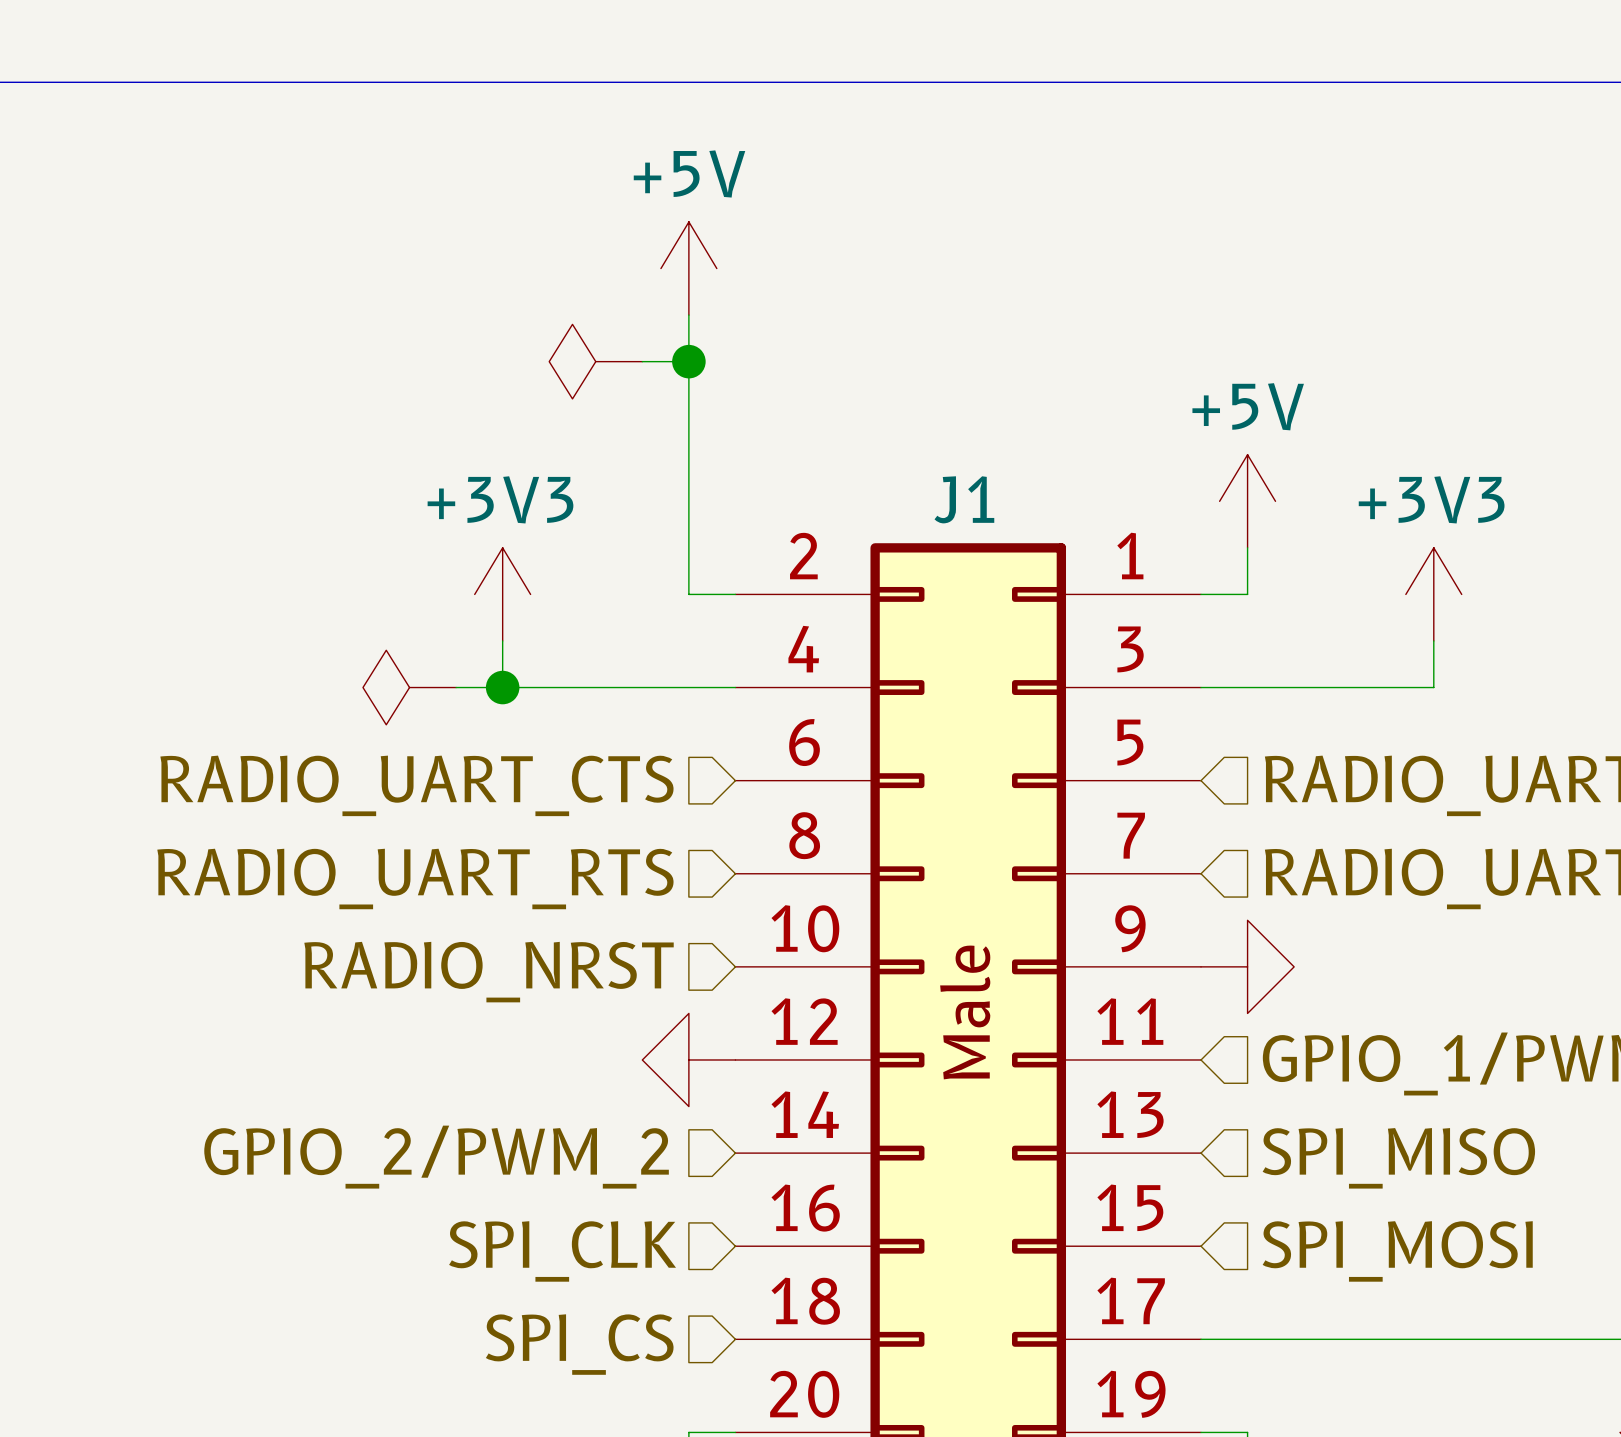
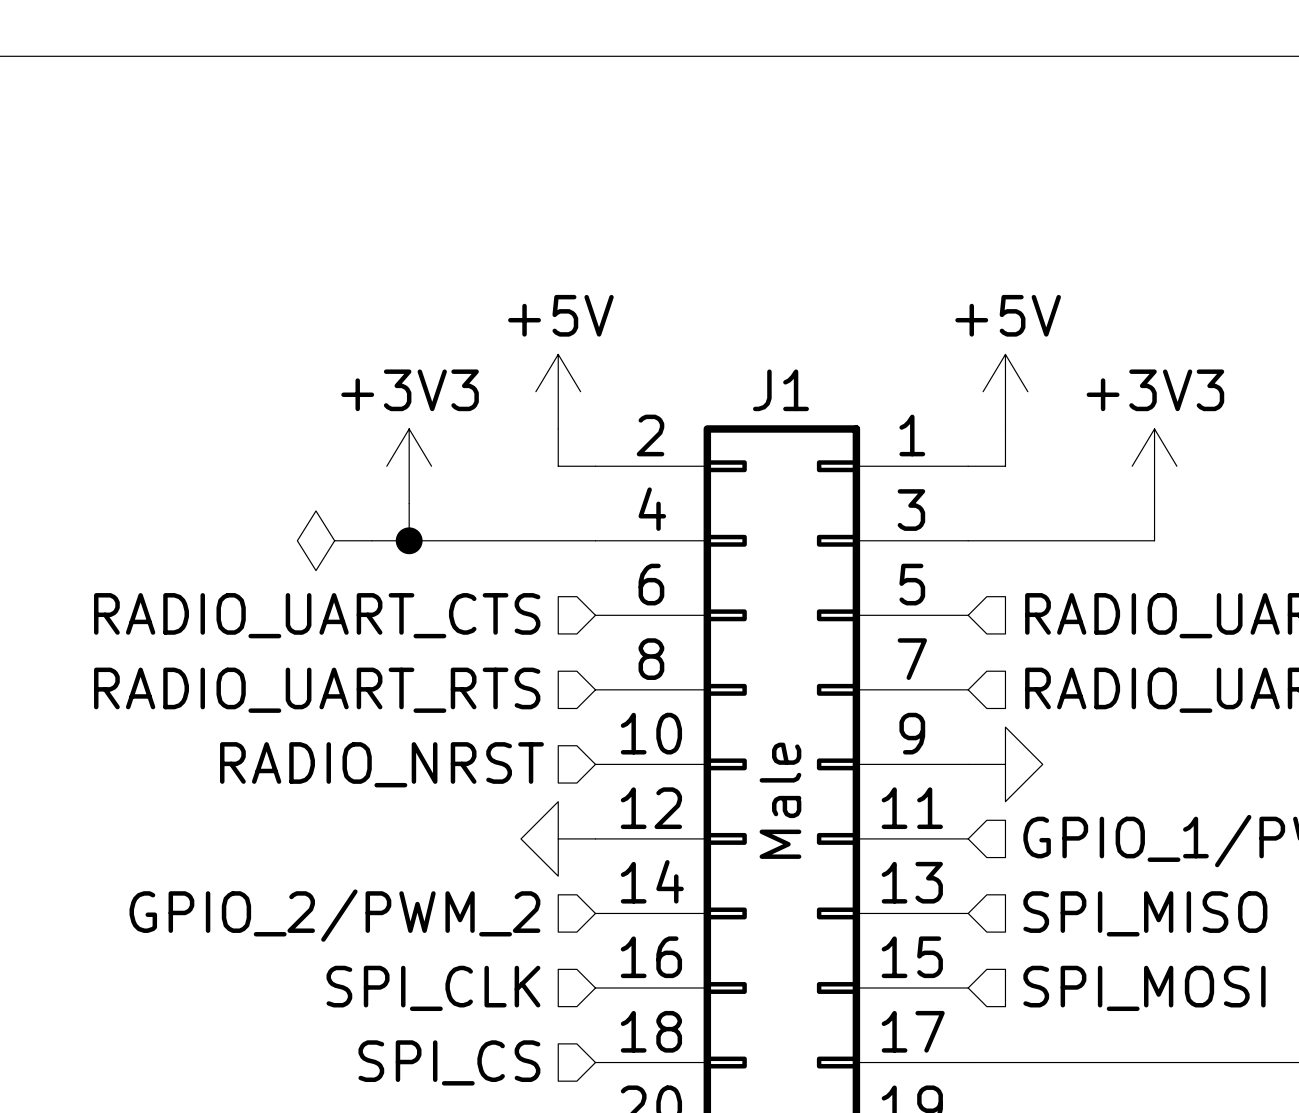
power symbol position: +5V (688, 268) -> +5V (558, 391)
wire: (688, 315) (688, 547) -> none
power symbol: (595, 361) -> none
wire: (642, 361) (688, 361) -> none
junction: (688, 361) -> none

